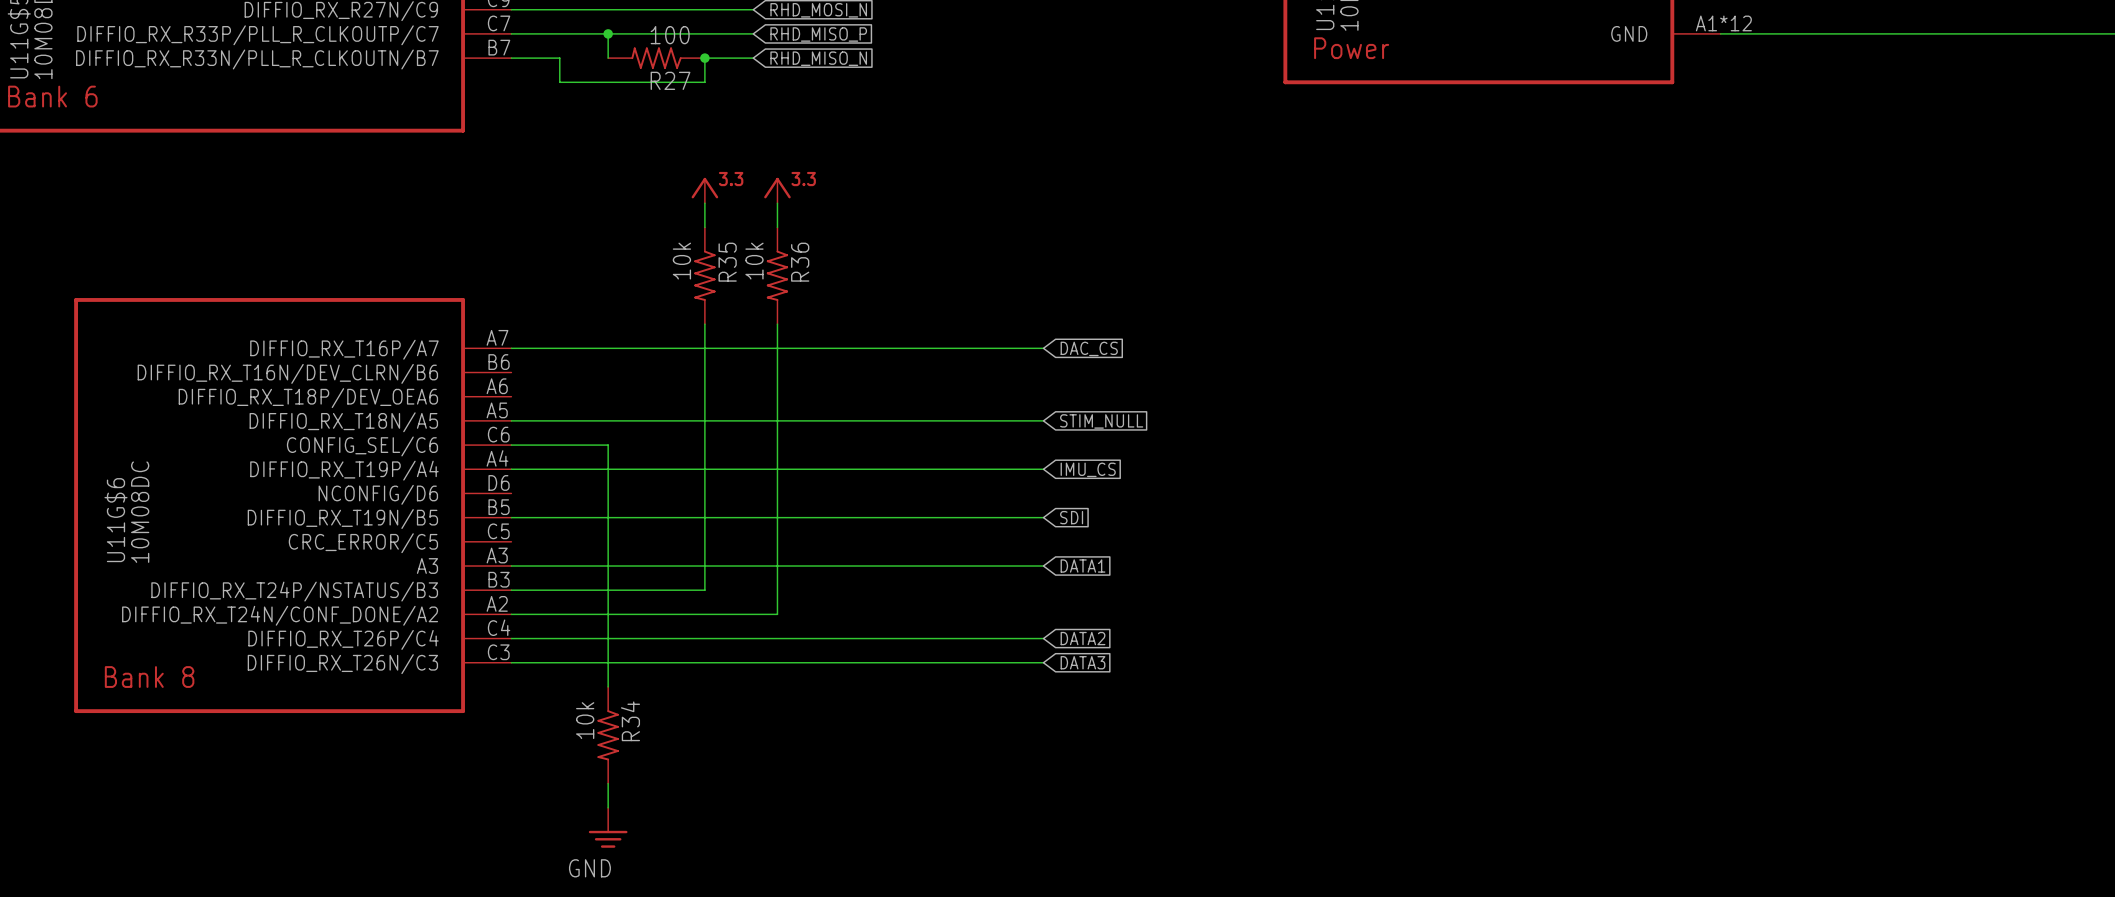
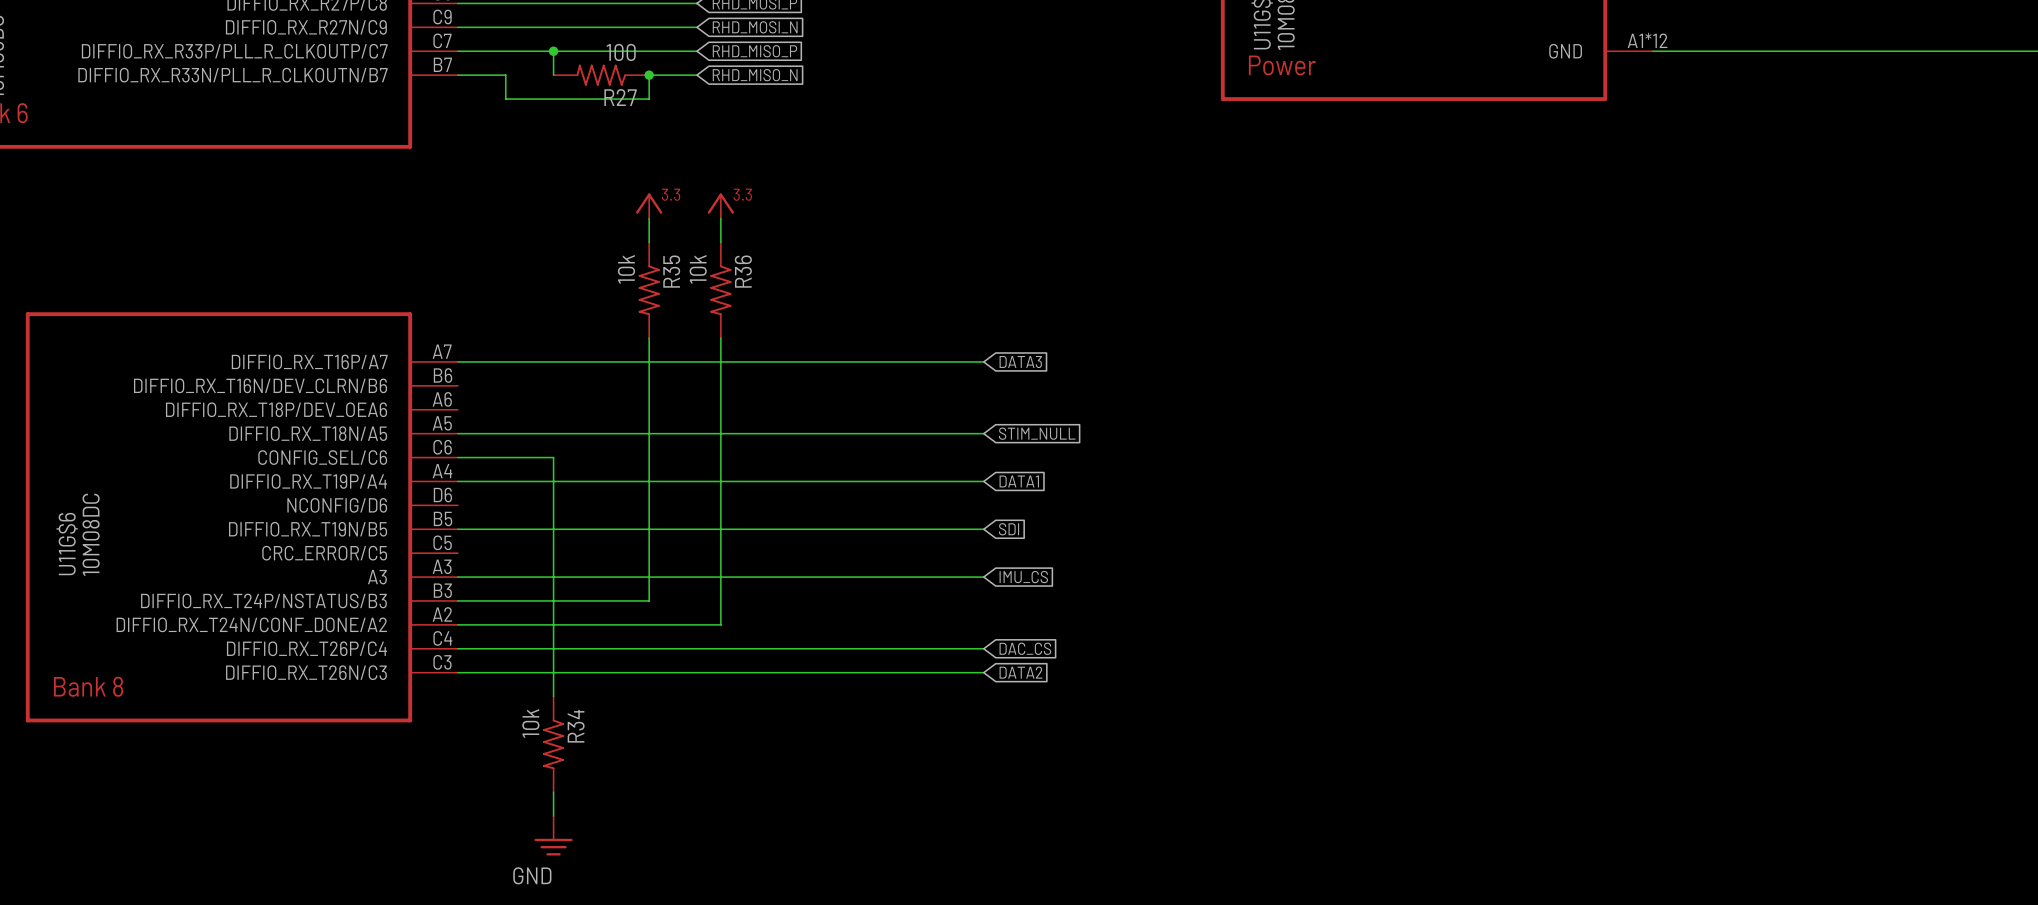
global label: DAC_CS (1089, 348) -> DATA3 (1020, 362)
global label: IMU_CS (1088, 469) -> DATA1 (1019, 481)
global label: DATA1 (1083, 566) -> IMU_CS (1023, 577)
global label: DATA2 (1083, 638) -> DAC_CS (1025, 648)
global label: DATA3 (1083, 662) -> DATA2 (1020, 672)

